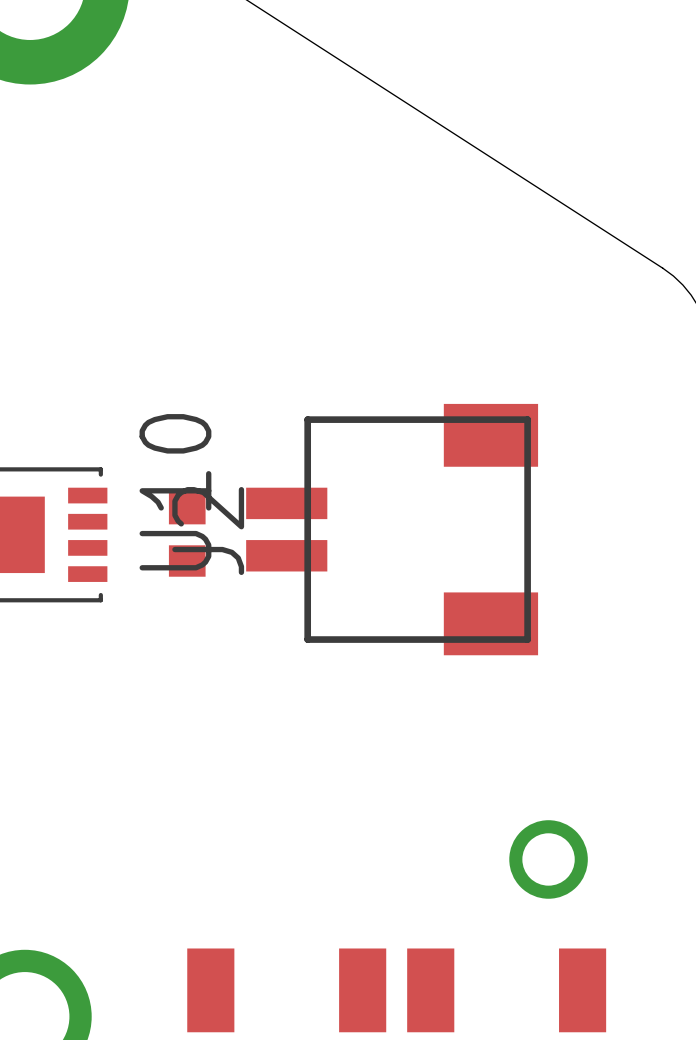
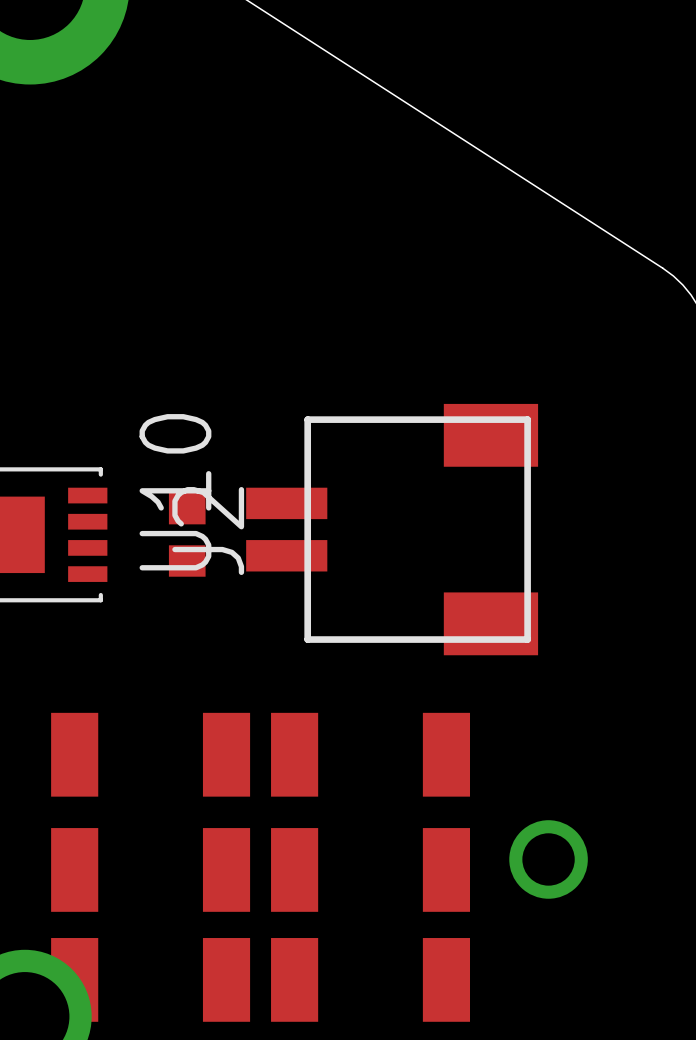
part: none -> (150, 754)
part: none -> (370, 754)
part: none -> (150, 869)
part: none -> (370, 869)
part: none -> (150, 979)
part: none -> (370, 979)
part: (286, 990) -> none
part: (506, 990) -> none

